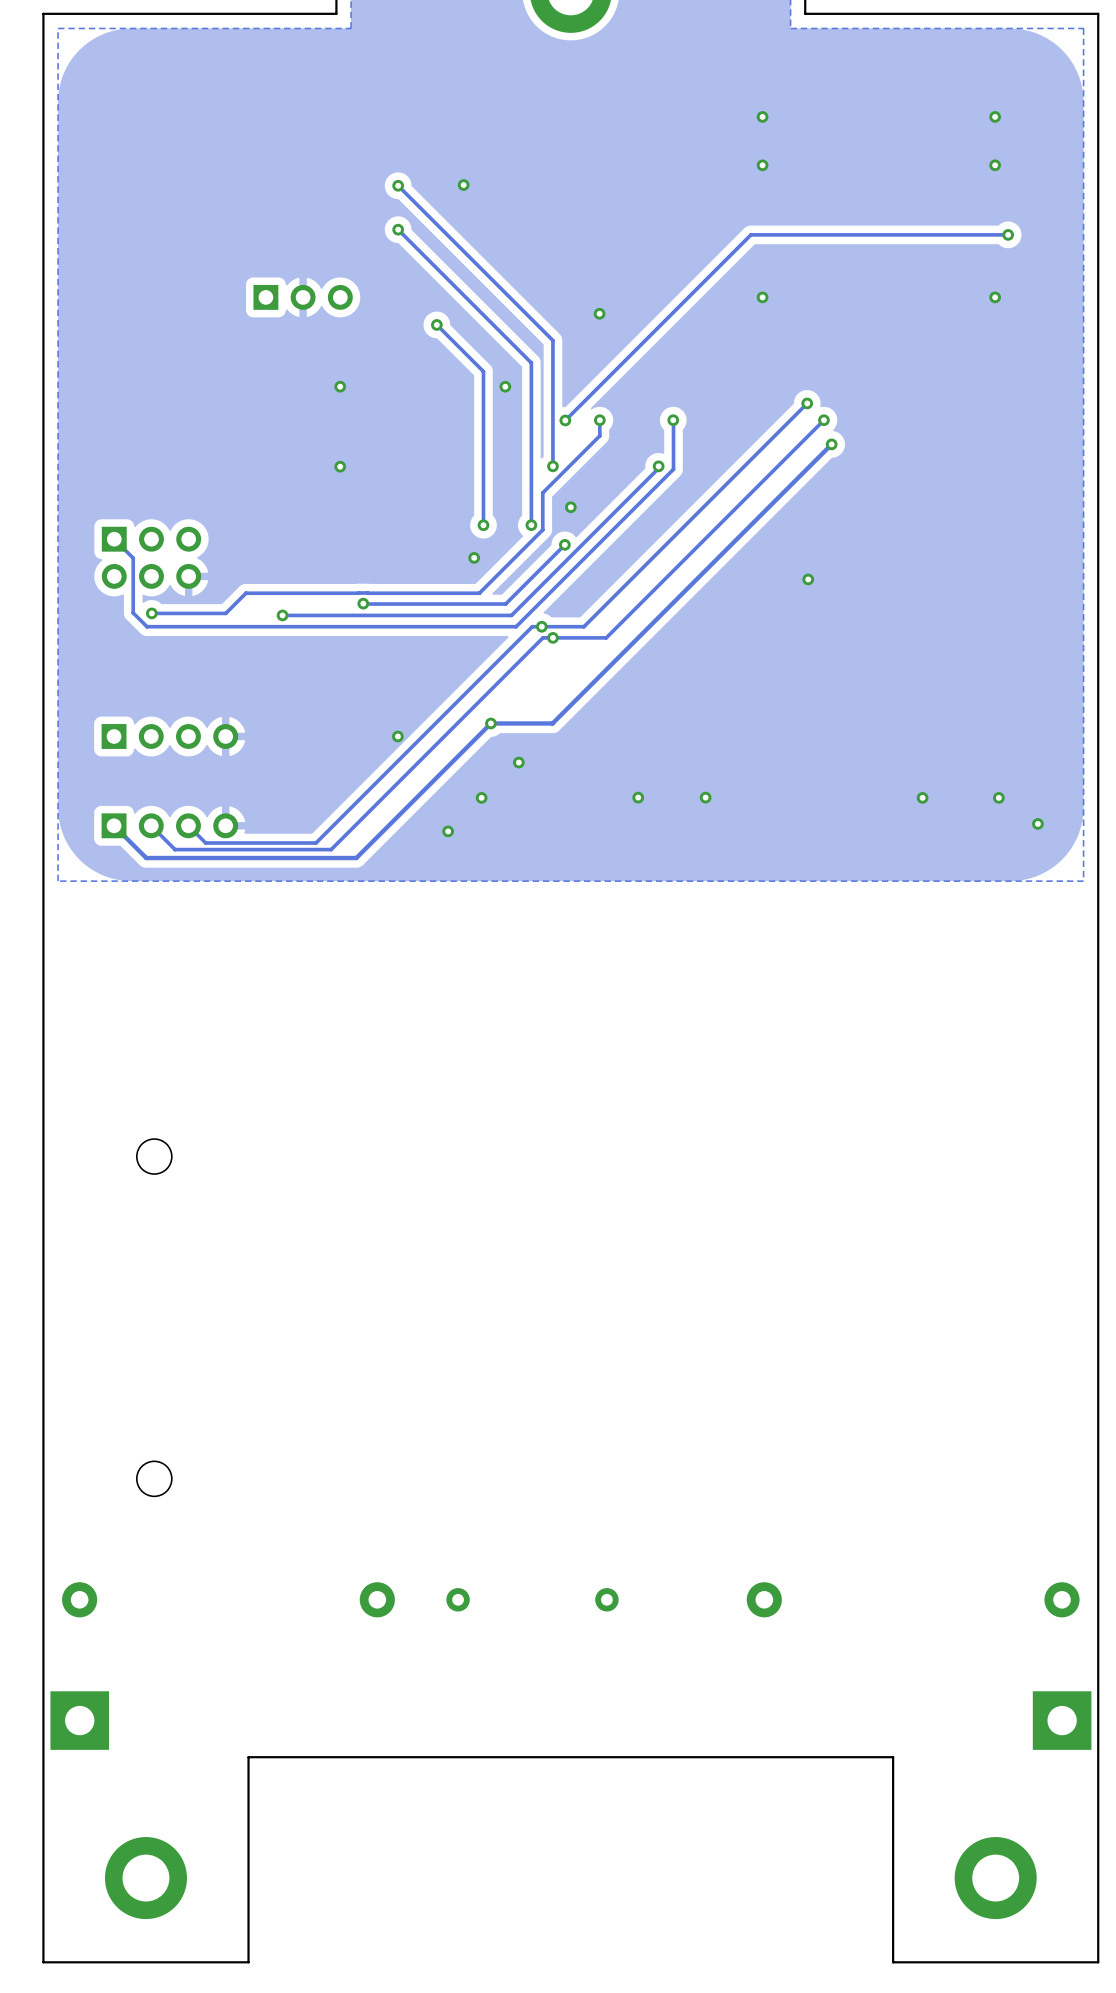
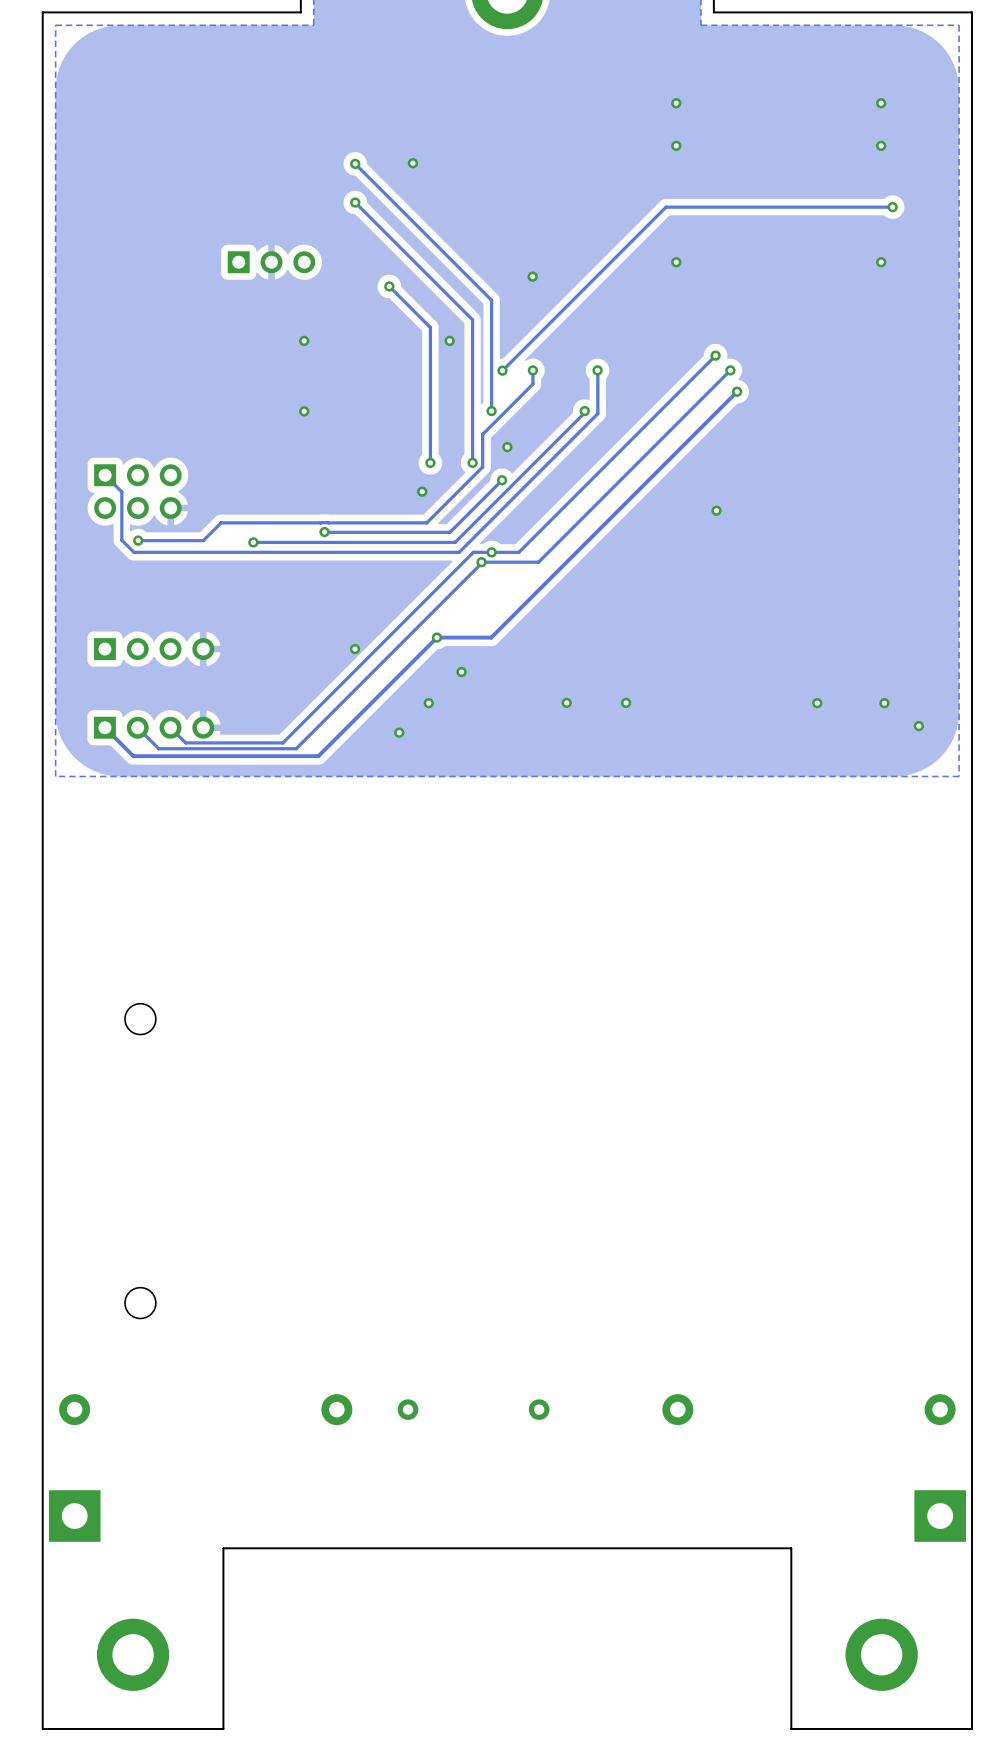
via: (541, 626) -> none
via: none -> (491, 552)
via: none -> (481, 562)
via: (552, 637) -> none

